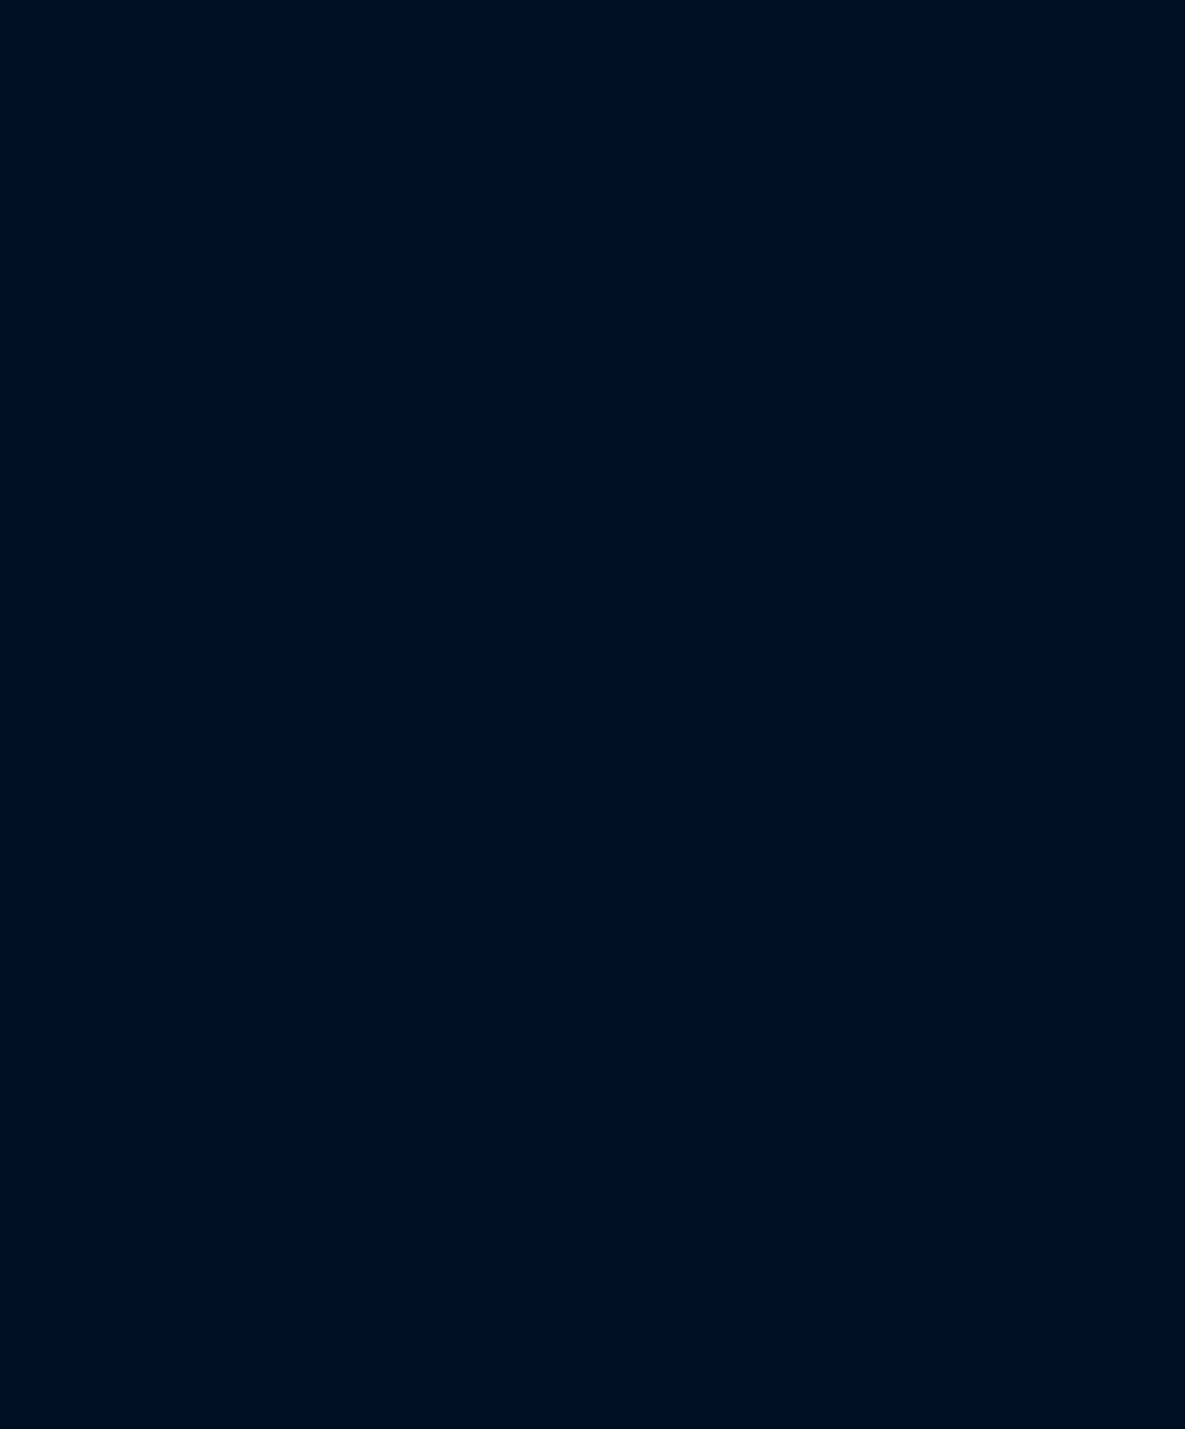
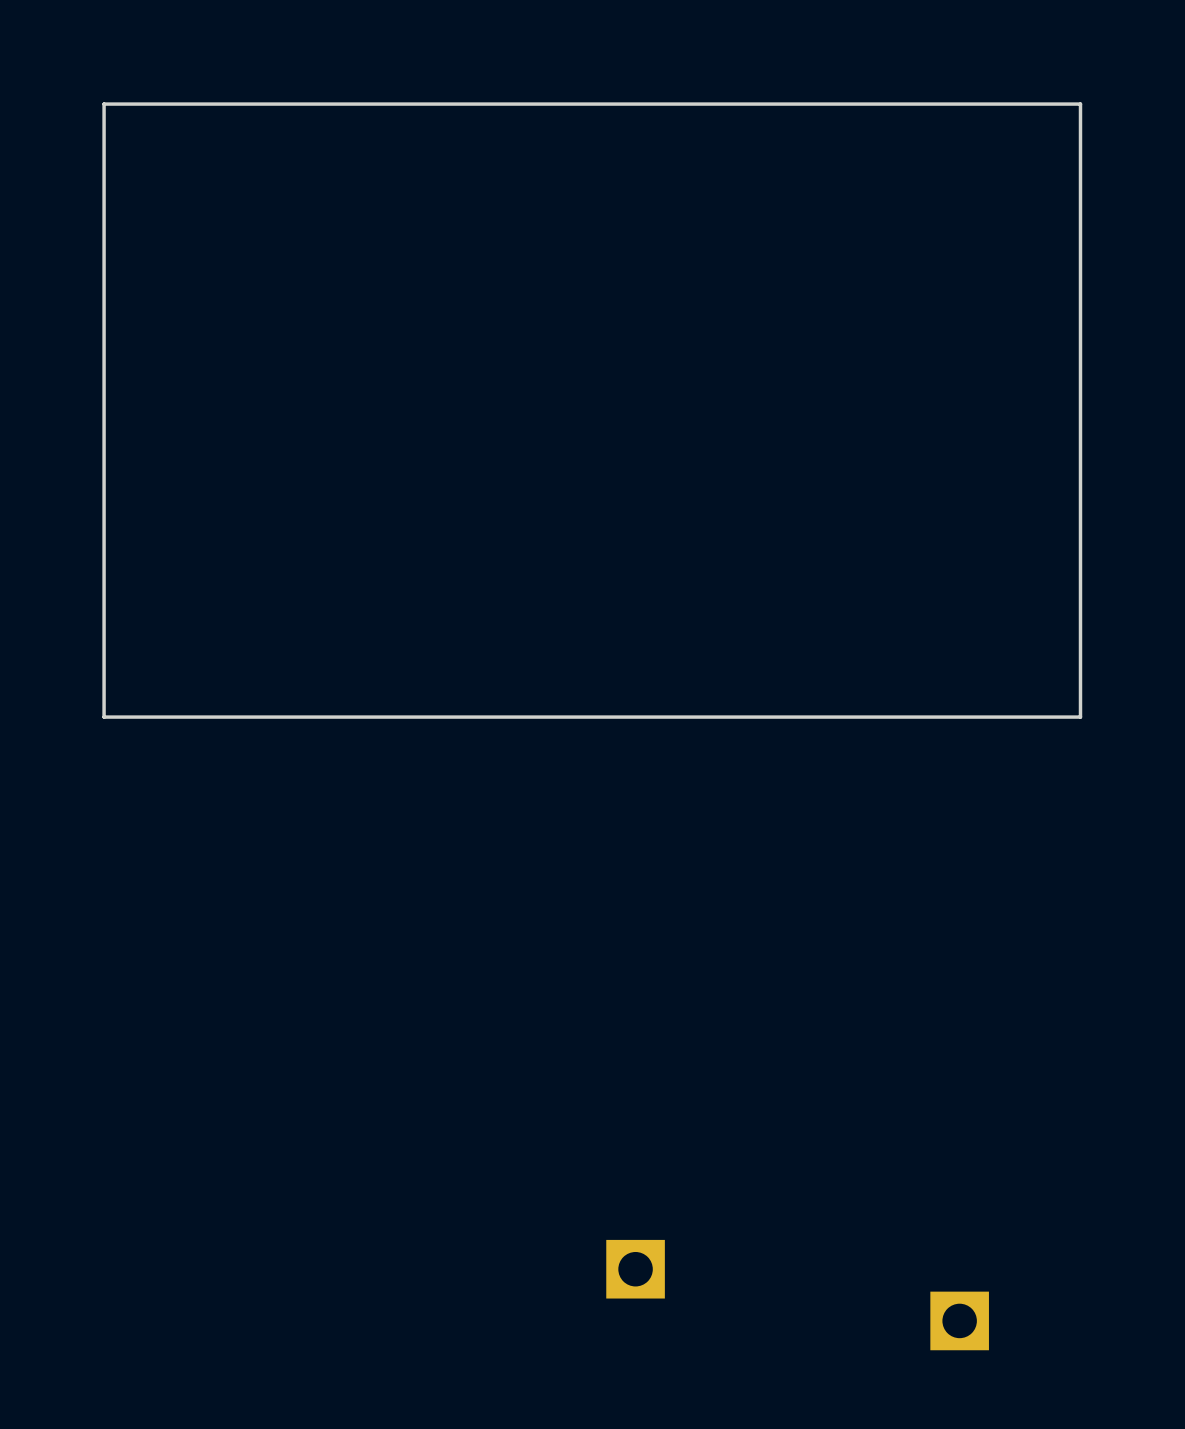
board edge: none -> (1080, 104) (1080, 717) (104, 717) (104, 104) (1080, 104)
part: none -> (635, 1269)
part: none -> (959, 1320)

